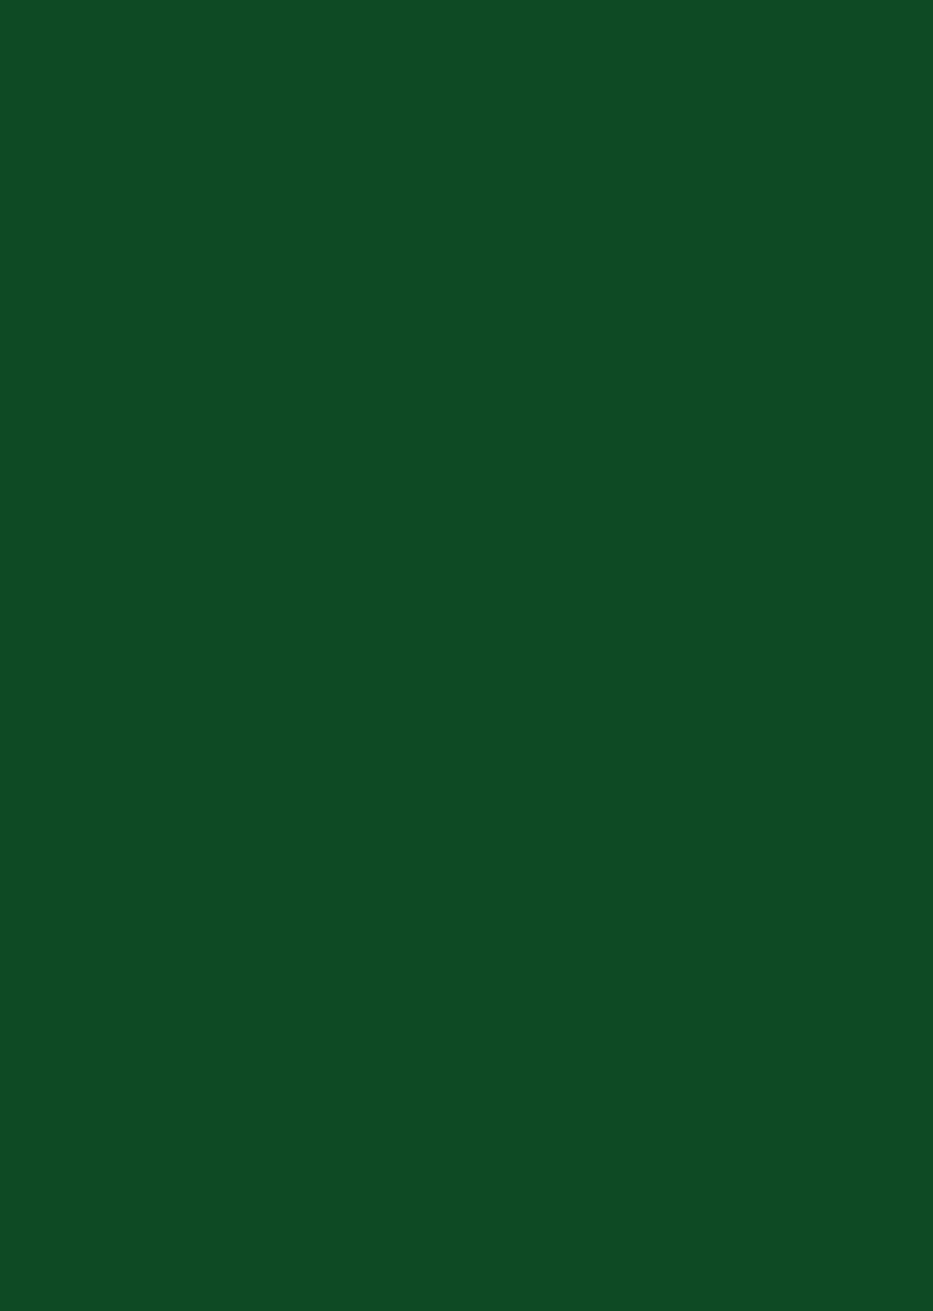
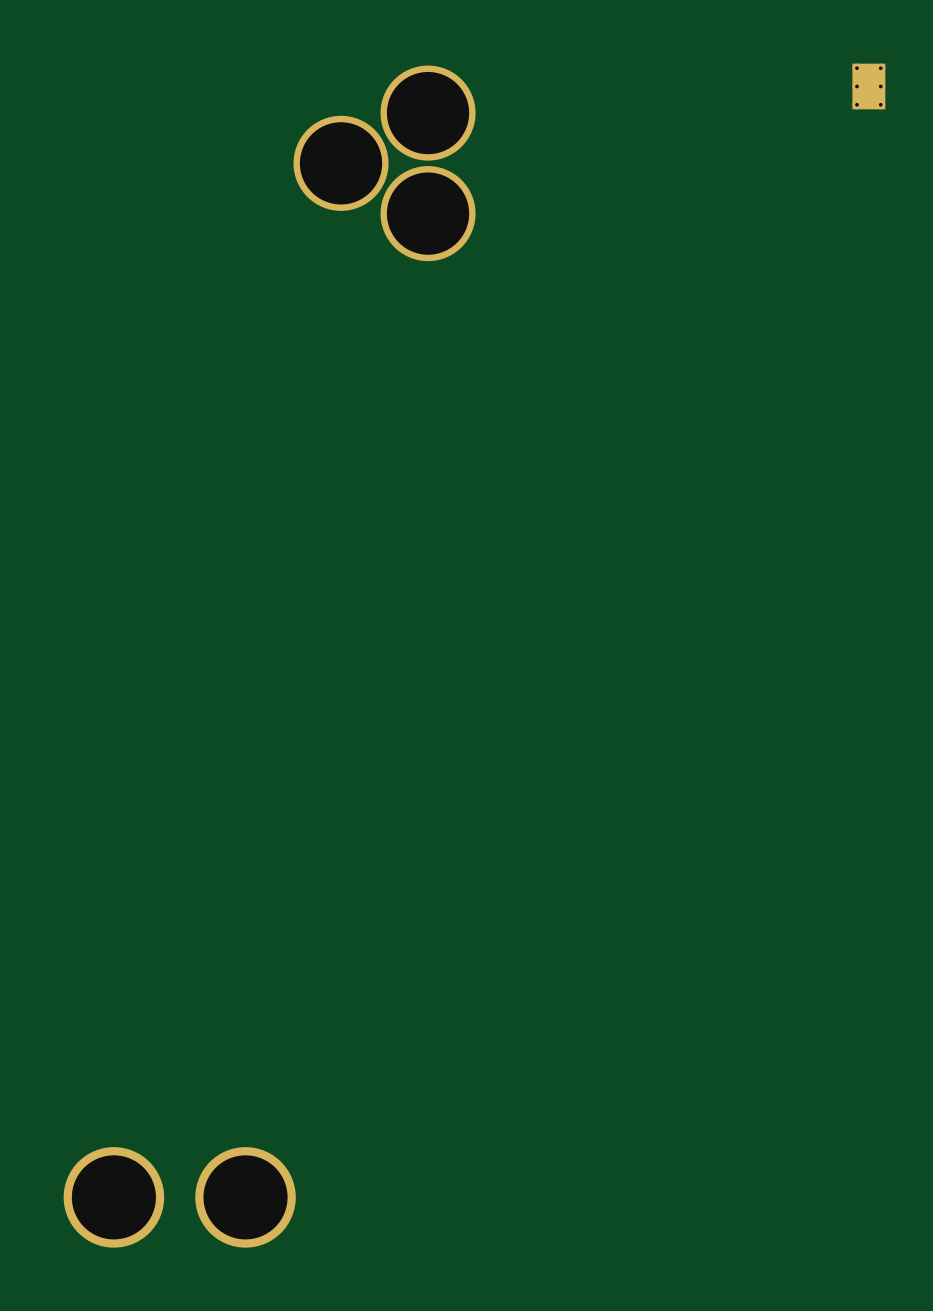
part: none -> (868, 86)
part: none -> (384, 163)
part: none -> (179, 1197)

